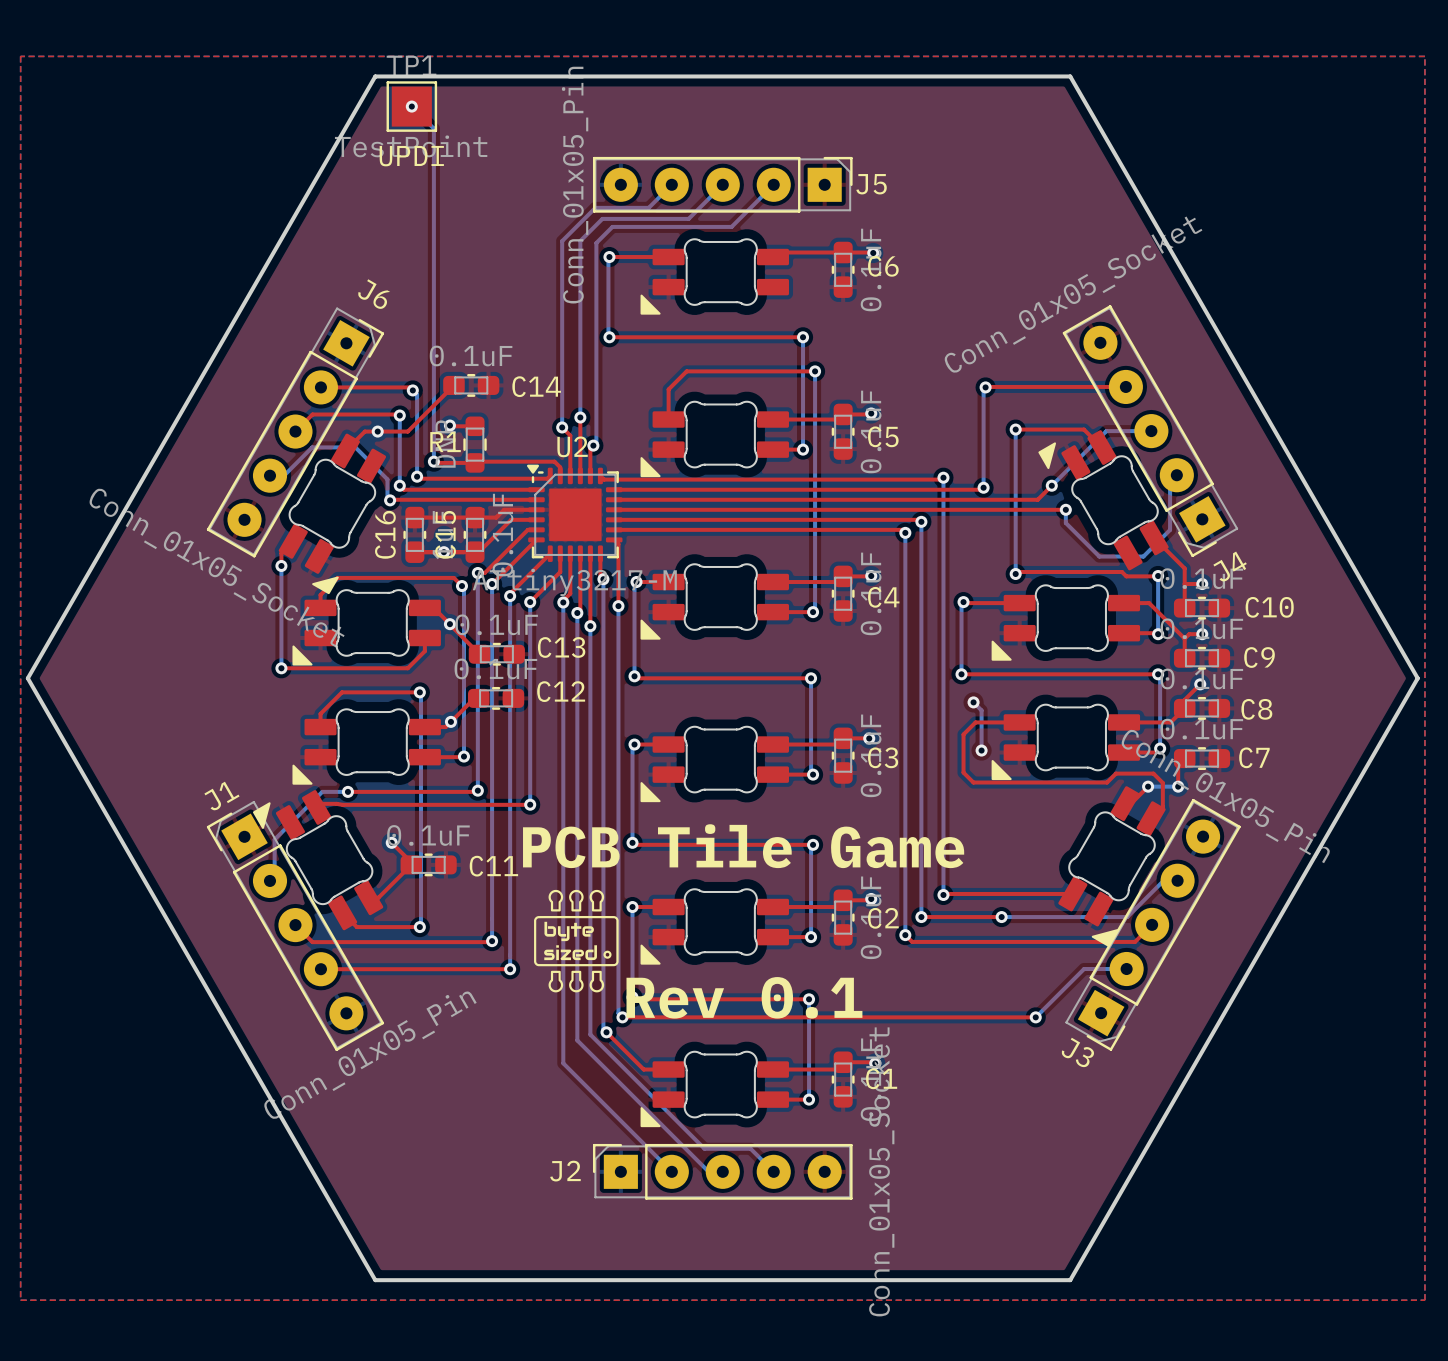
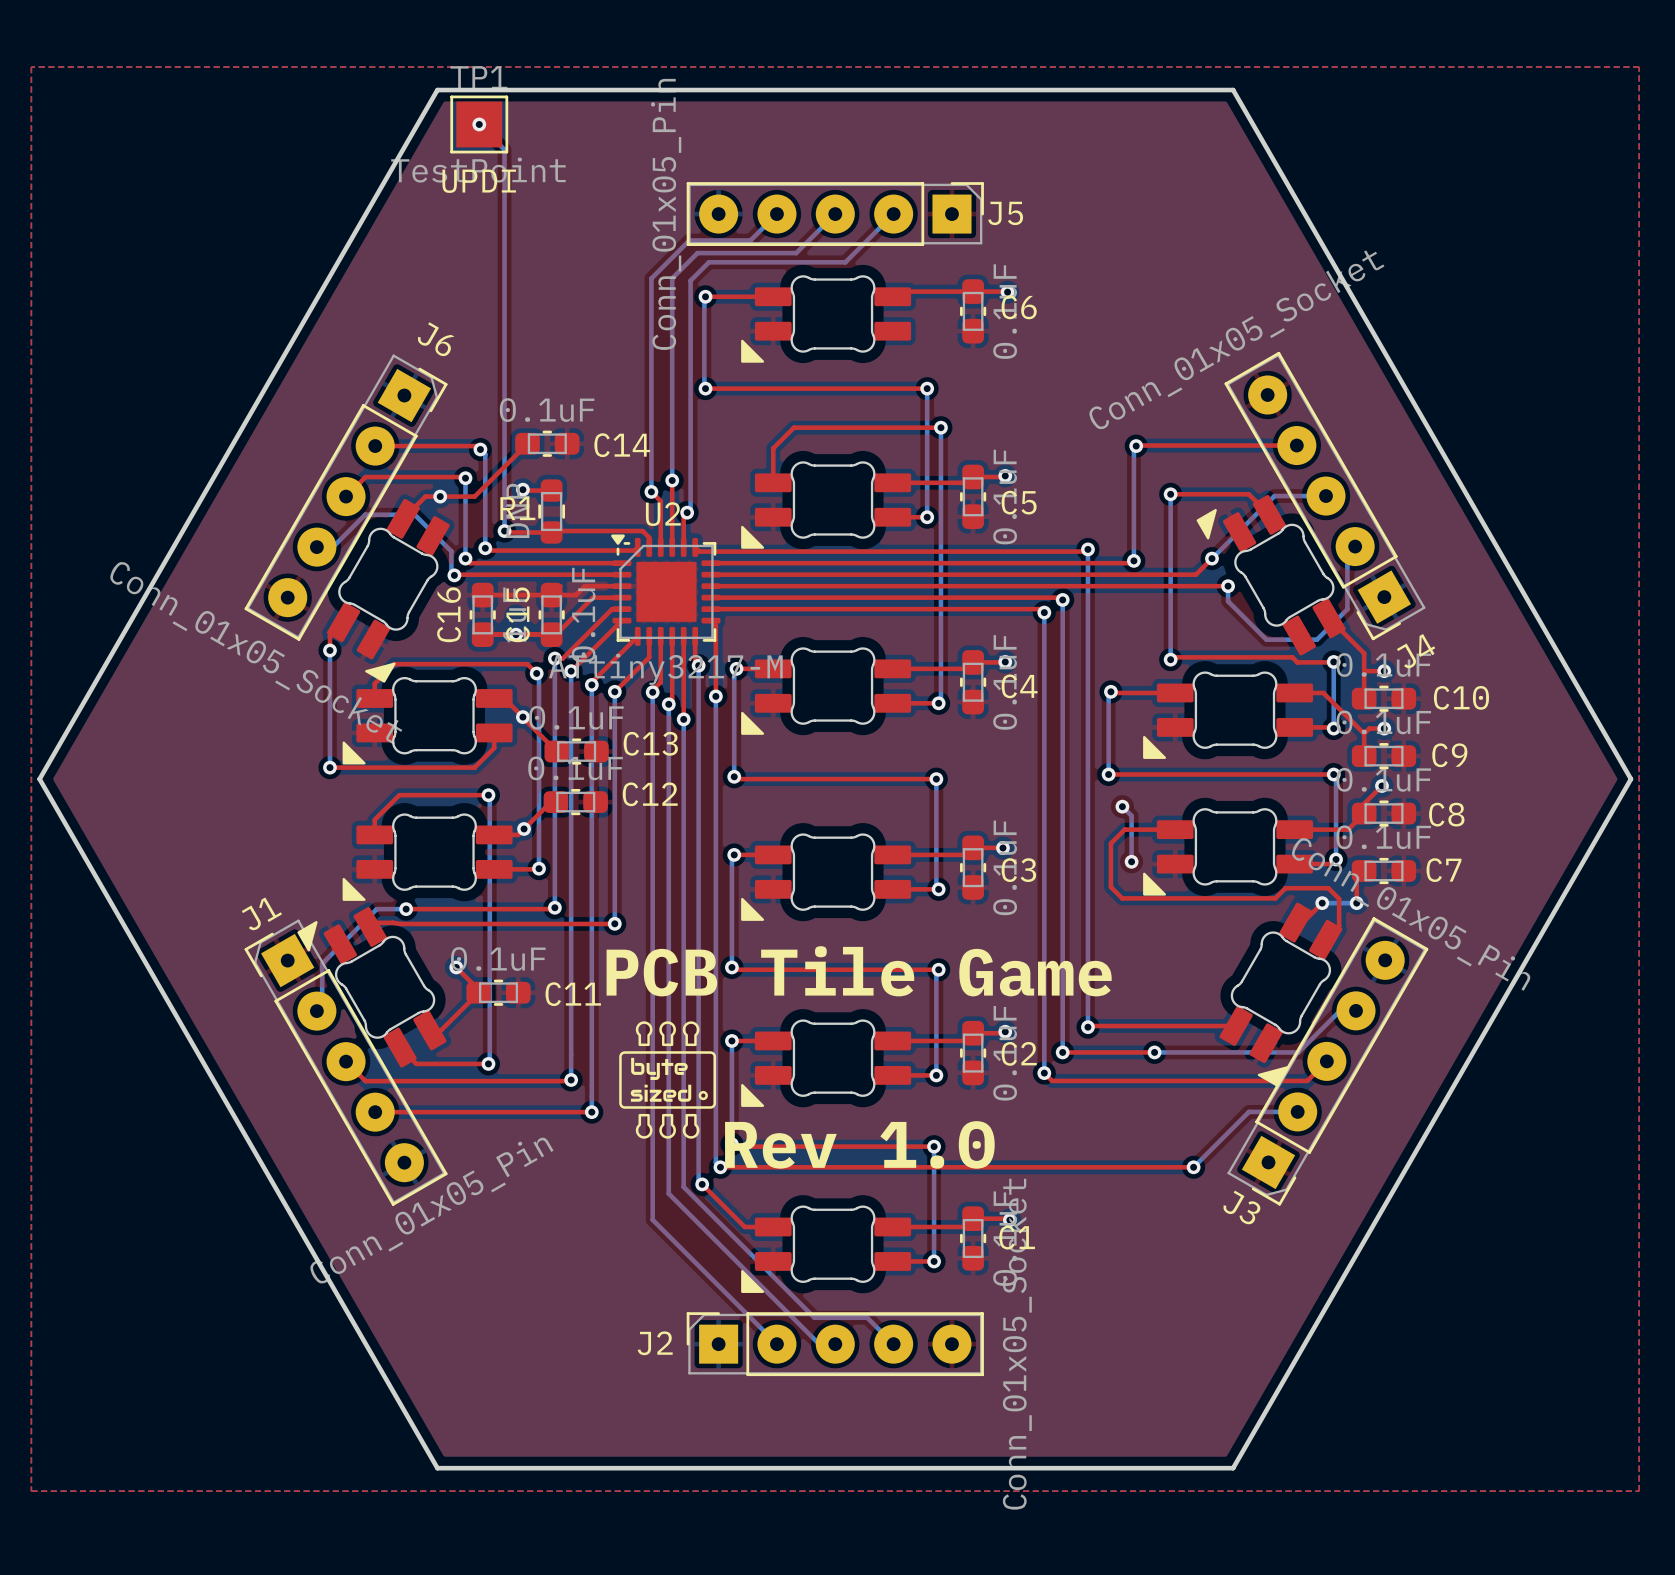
text: Rev 0.1 (744, 997) -> Rev 1.0 (859, 1144)

